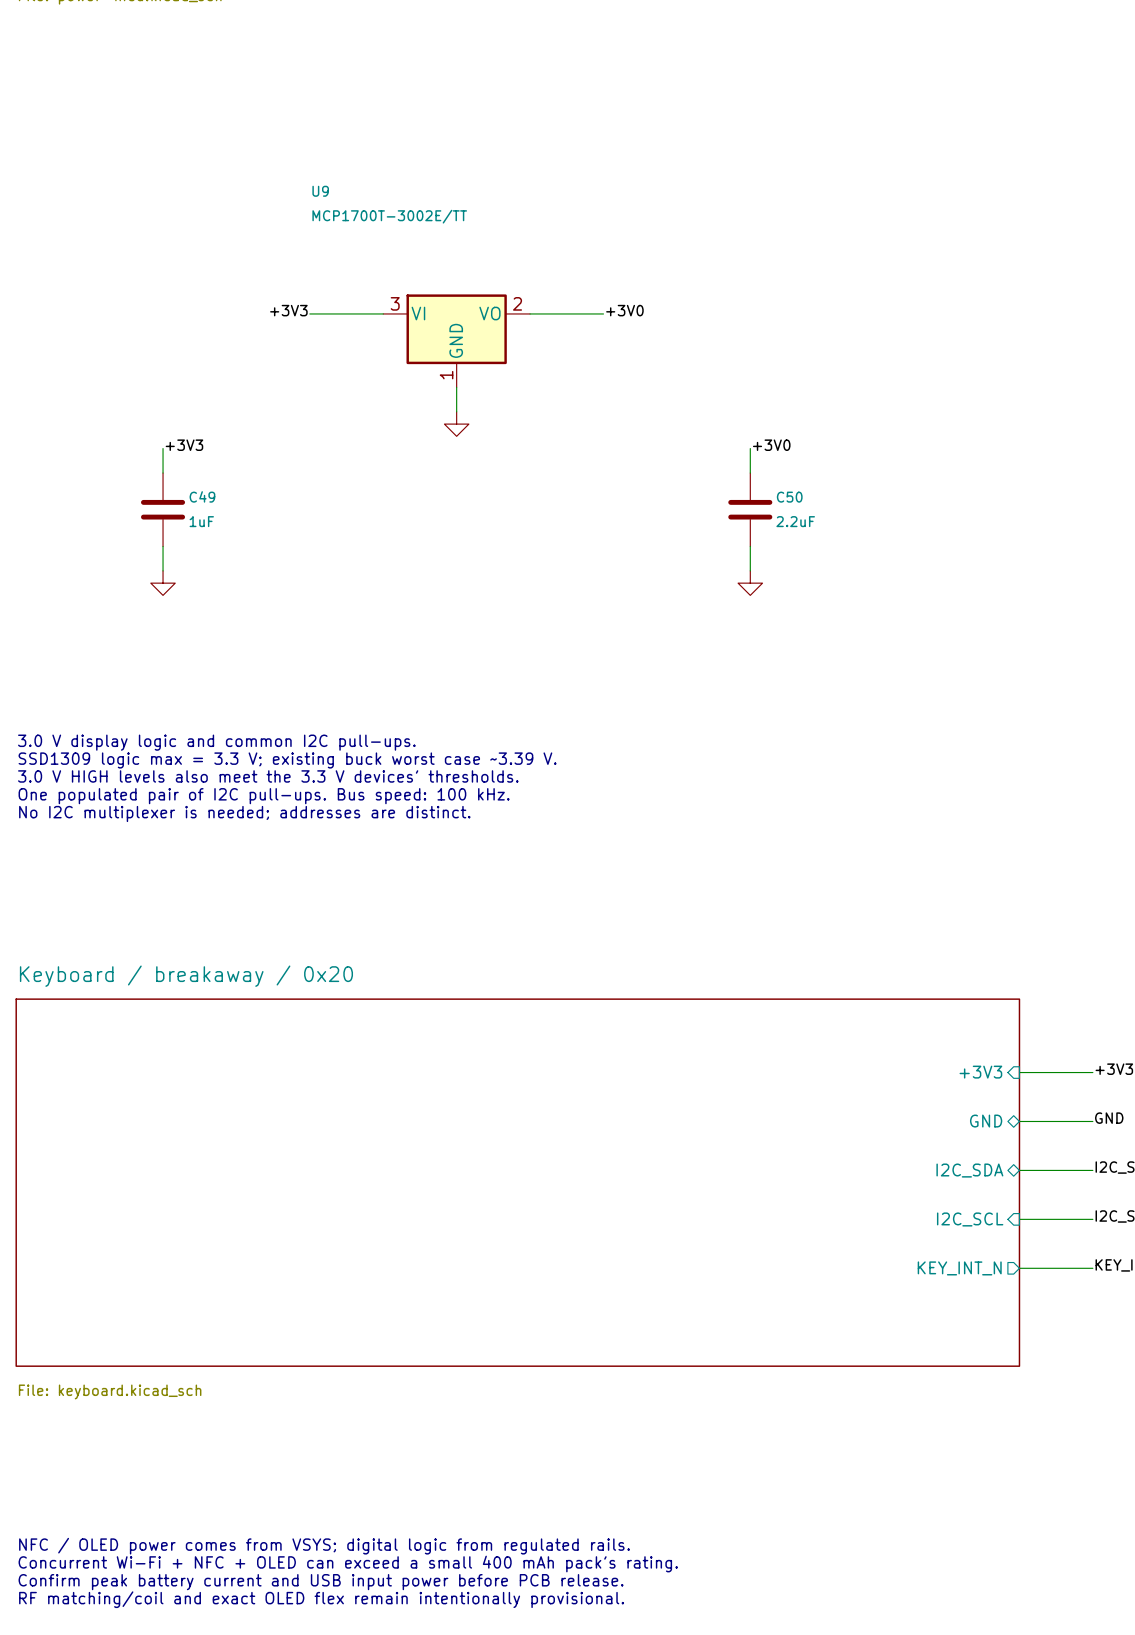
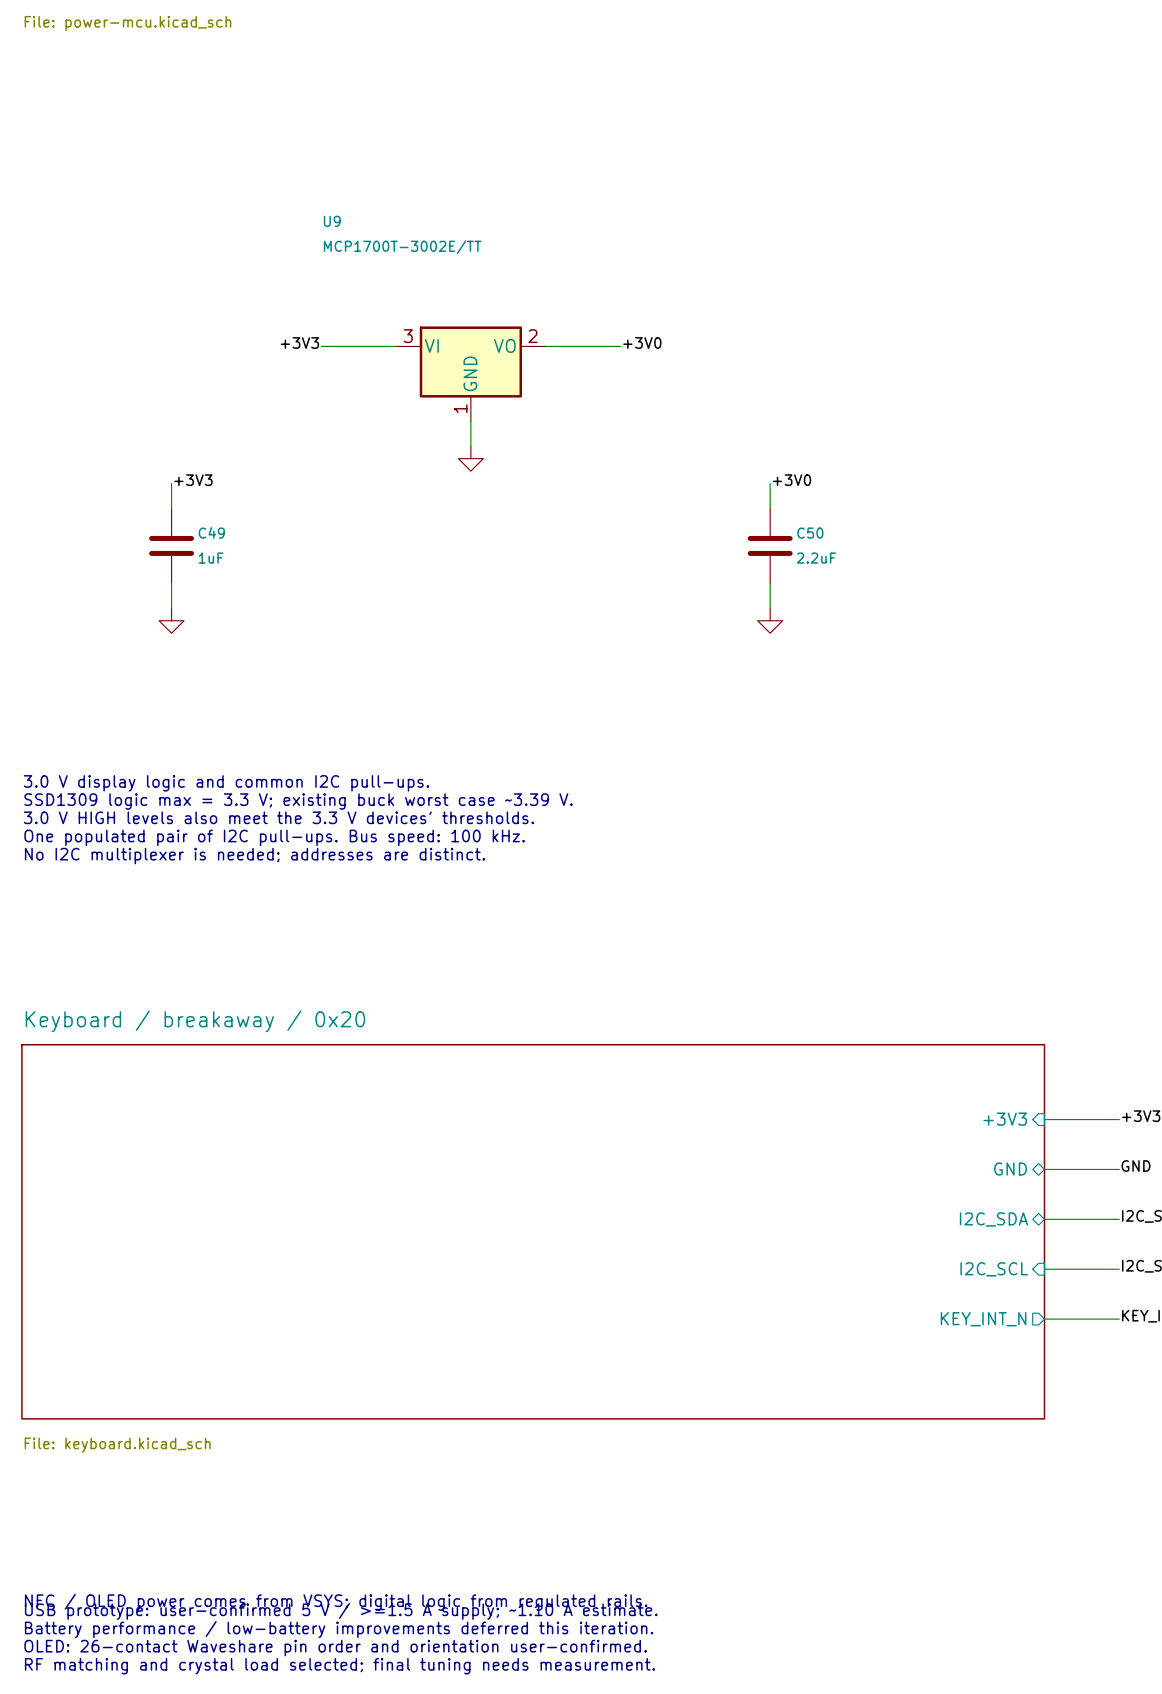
text: none -> USB prototype: user-confirmed 5 V / >=1.5 A supply; ~1.10 A estimate. (341, 1611)
text: Concurrent Wi-Fi + NFC + OLED can exceed a small 400 mAh pack's rating. (348, 1564) -> none
text: none -> Battery performance / low-battery improvements deferred this iteration. (339, 1629)
text: Confirm peak battery current and USB input power before PCB release. (321, 1582) -> none
text: none -> OLED: 26-contact Waveshare pin order and orientation user-confirmed. (335, 1648)
text: RF matching/coil and exact OLED flex remain intentionally provisional. (321, 1599) -> none
text: none -> RF matching and crystal load selected; final tuning needs measurement. (339, 1666)

